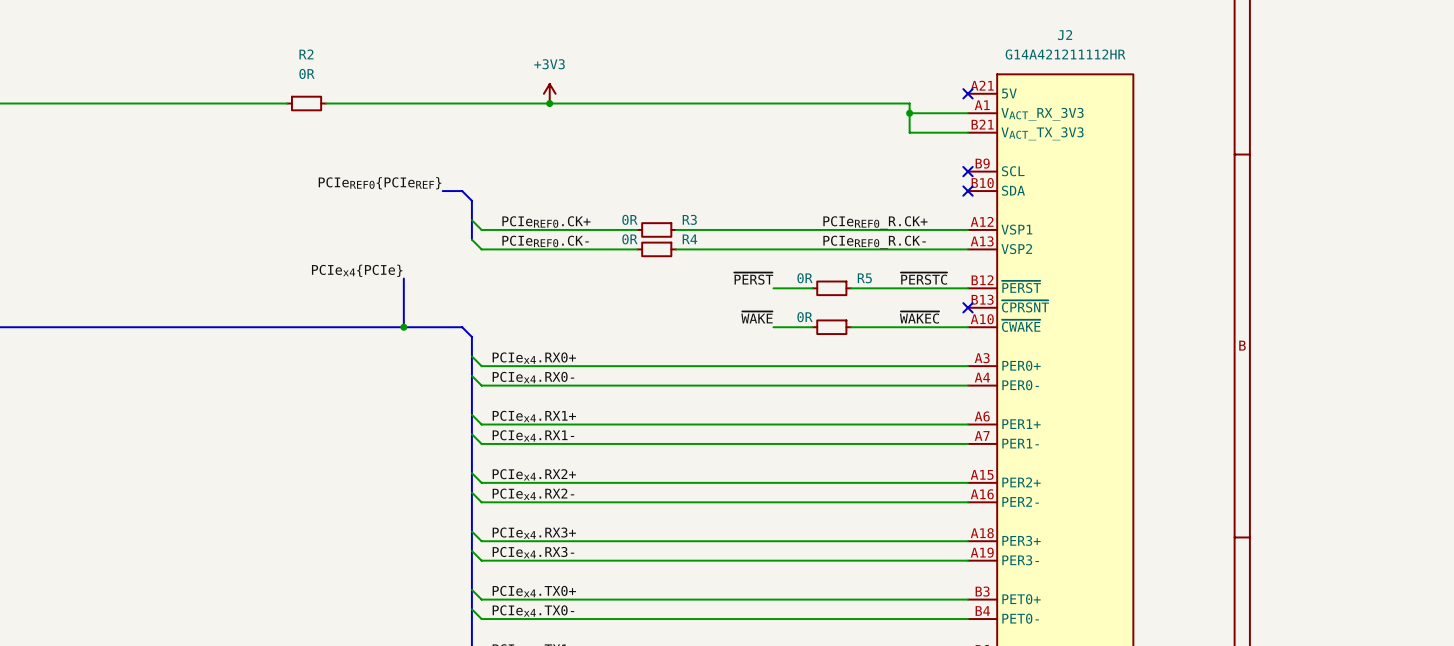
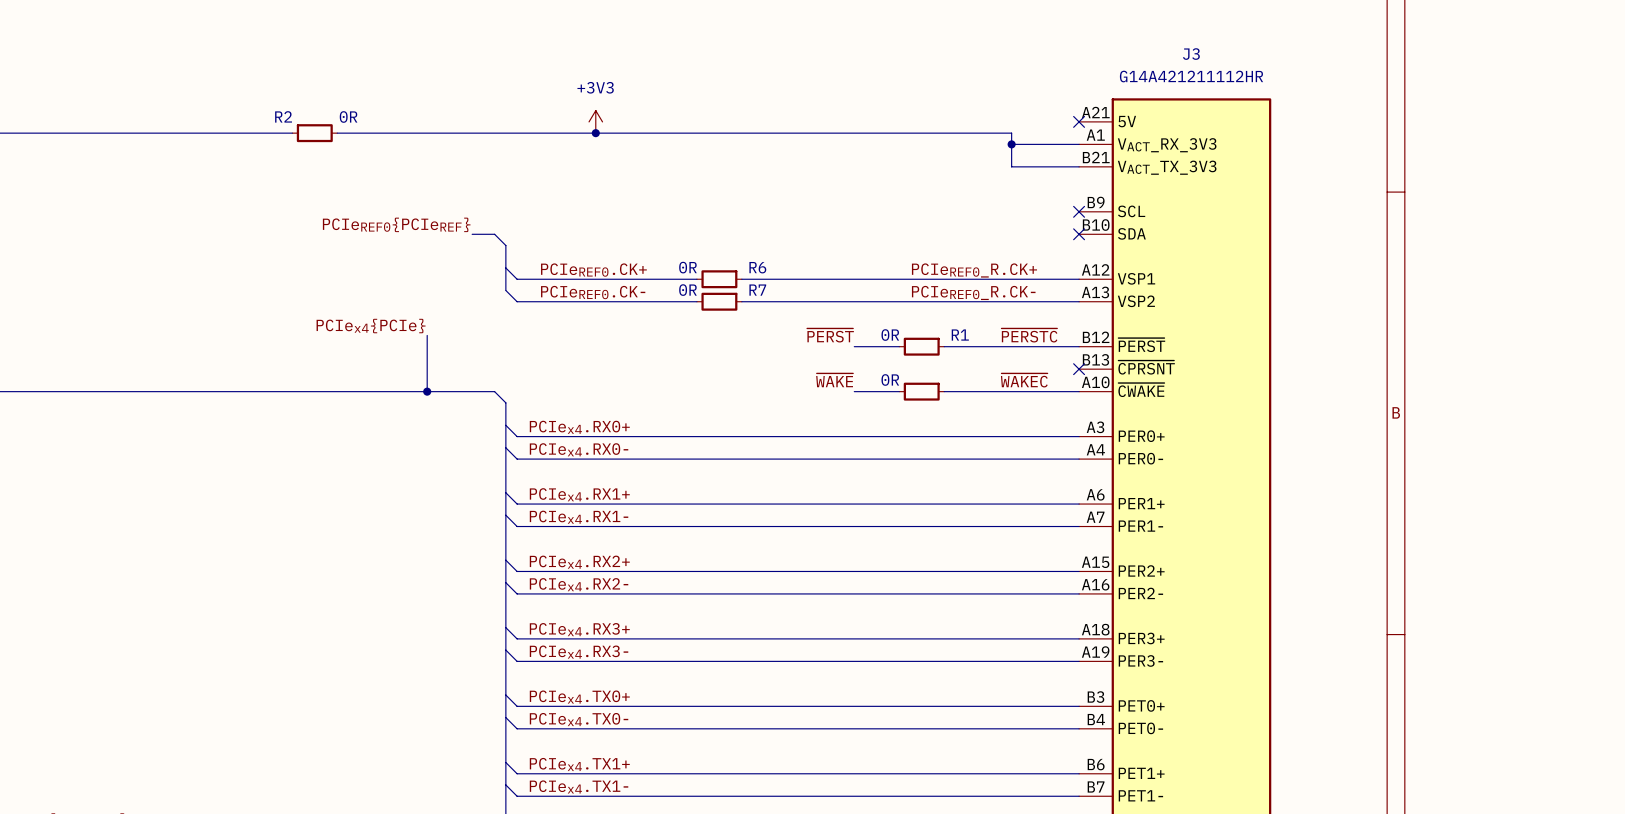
J2 name: J2 (1065, 35) -> J3 (1191, 54)
R2 name position: R2 (306, 54) -> R2 (283, 116)
R2 text position: 0R (307, 73) -> 0R (348, 116)
R3 name: R3 (689, 219) -> R6 (757, 267)
R4 name: R4 (689, 239) -> R7 (757, 290)
R5 name: R5 (864, 278) -> R1 (960, 335)

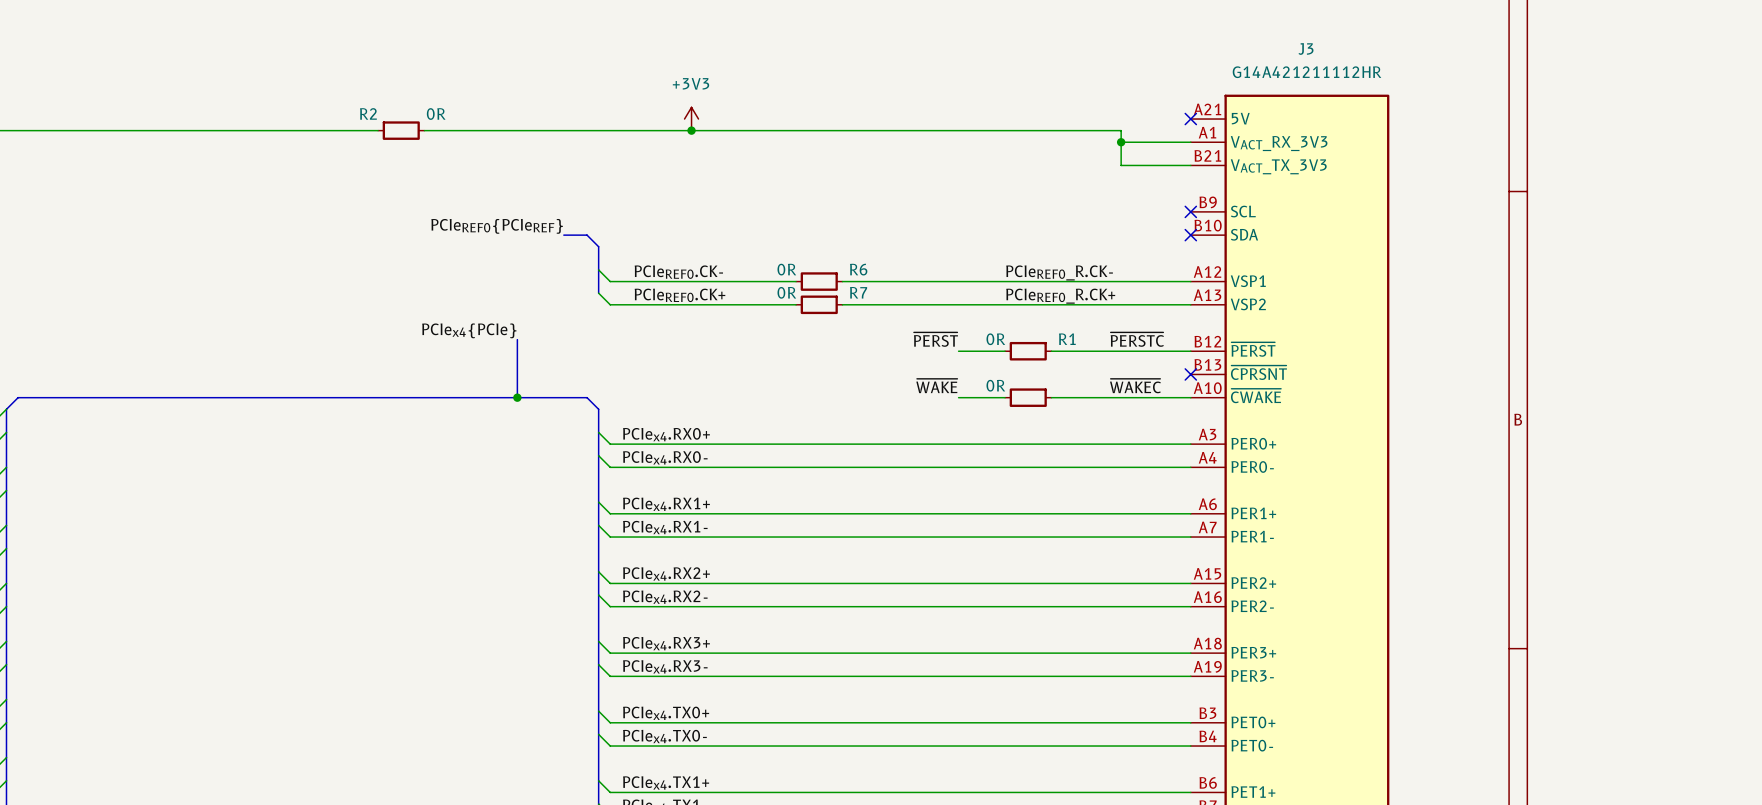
label: PCIeREF0.CK+ (593, 270) -> PCIeREF0.CK- (678, 272)
label position: PCIeREF0_R.CK+ (974, 270) -> PCIeREF0_R.CK+ (1060, 296)
label: PCIeREF0.CK- (593, 292) -> PCIeREF0.CK+ (679, 295)
label position: PCIeREF0_R.CK- (973, 292) -> PCIeREF0_R.CK- (1059, 272)

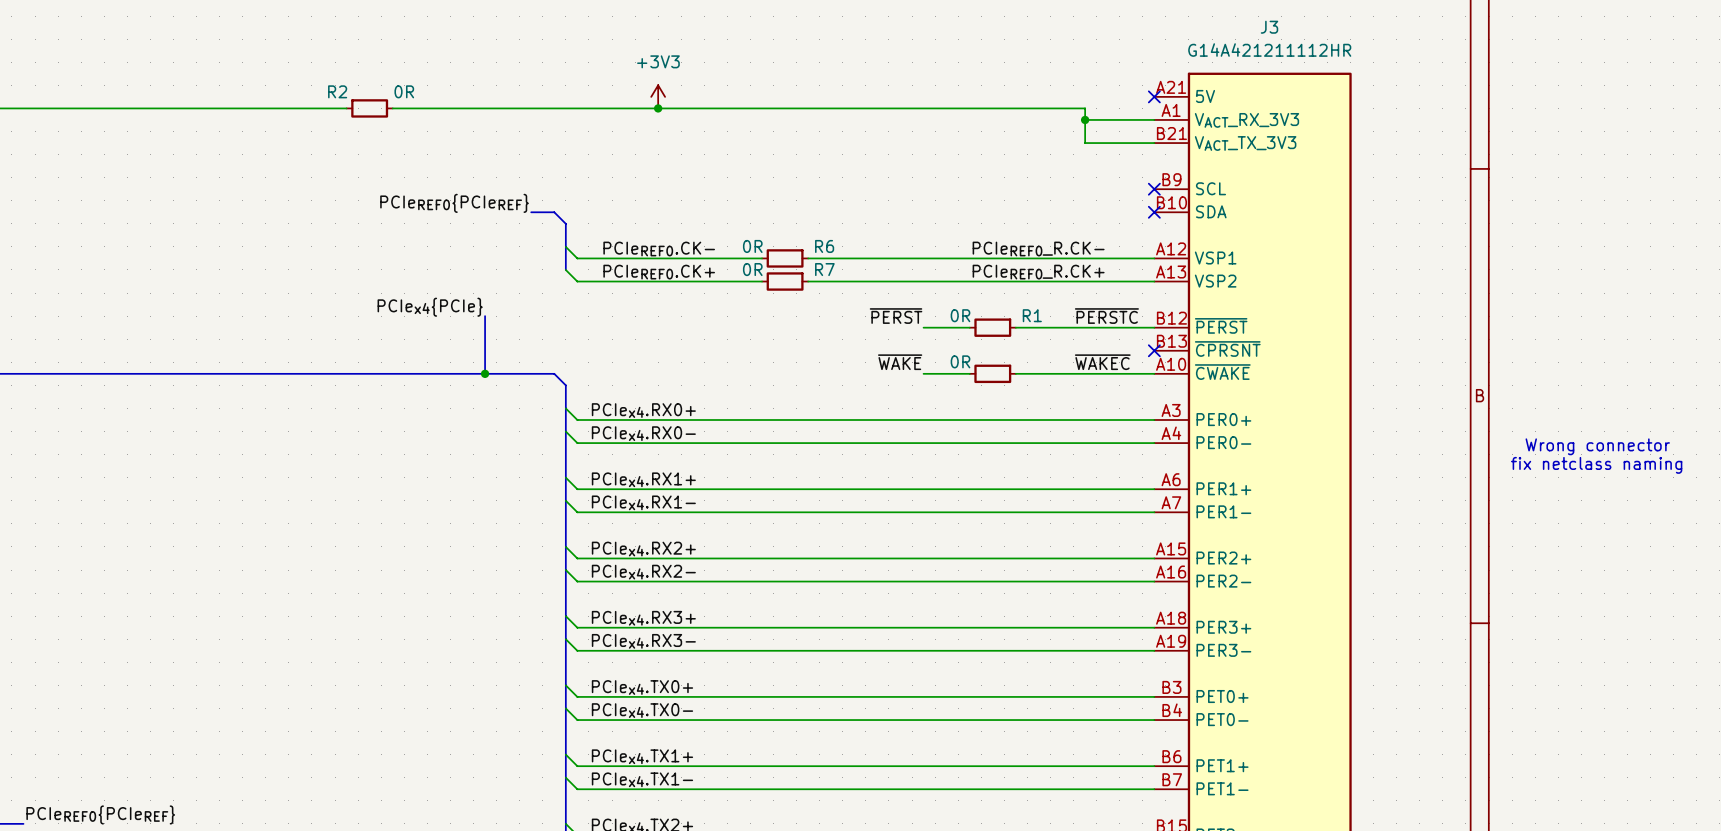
text: none -> Wrong connector (1597, 446)
text: none -> fix netclass naming (1596, 465)

